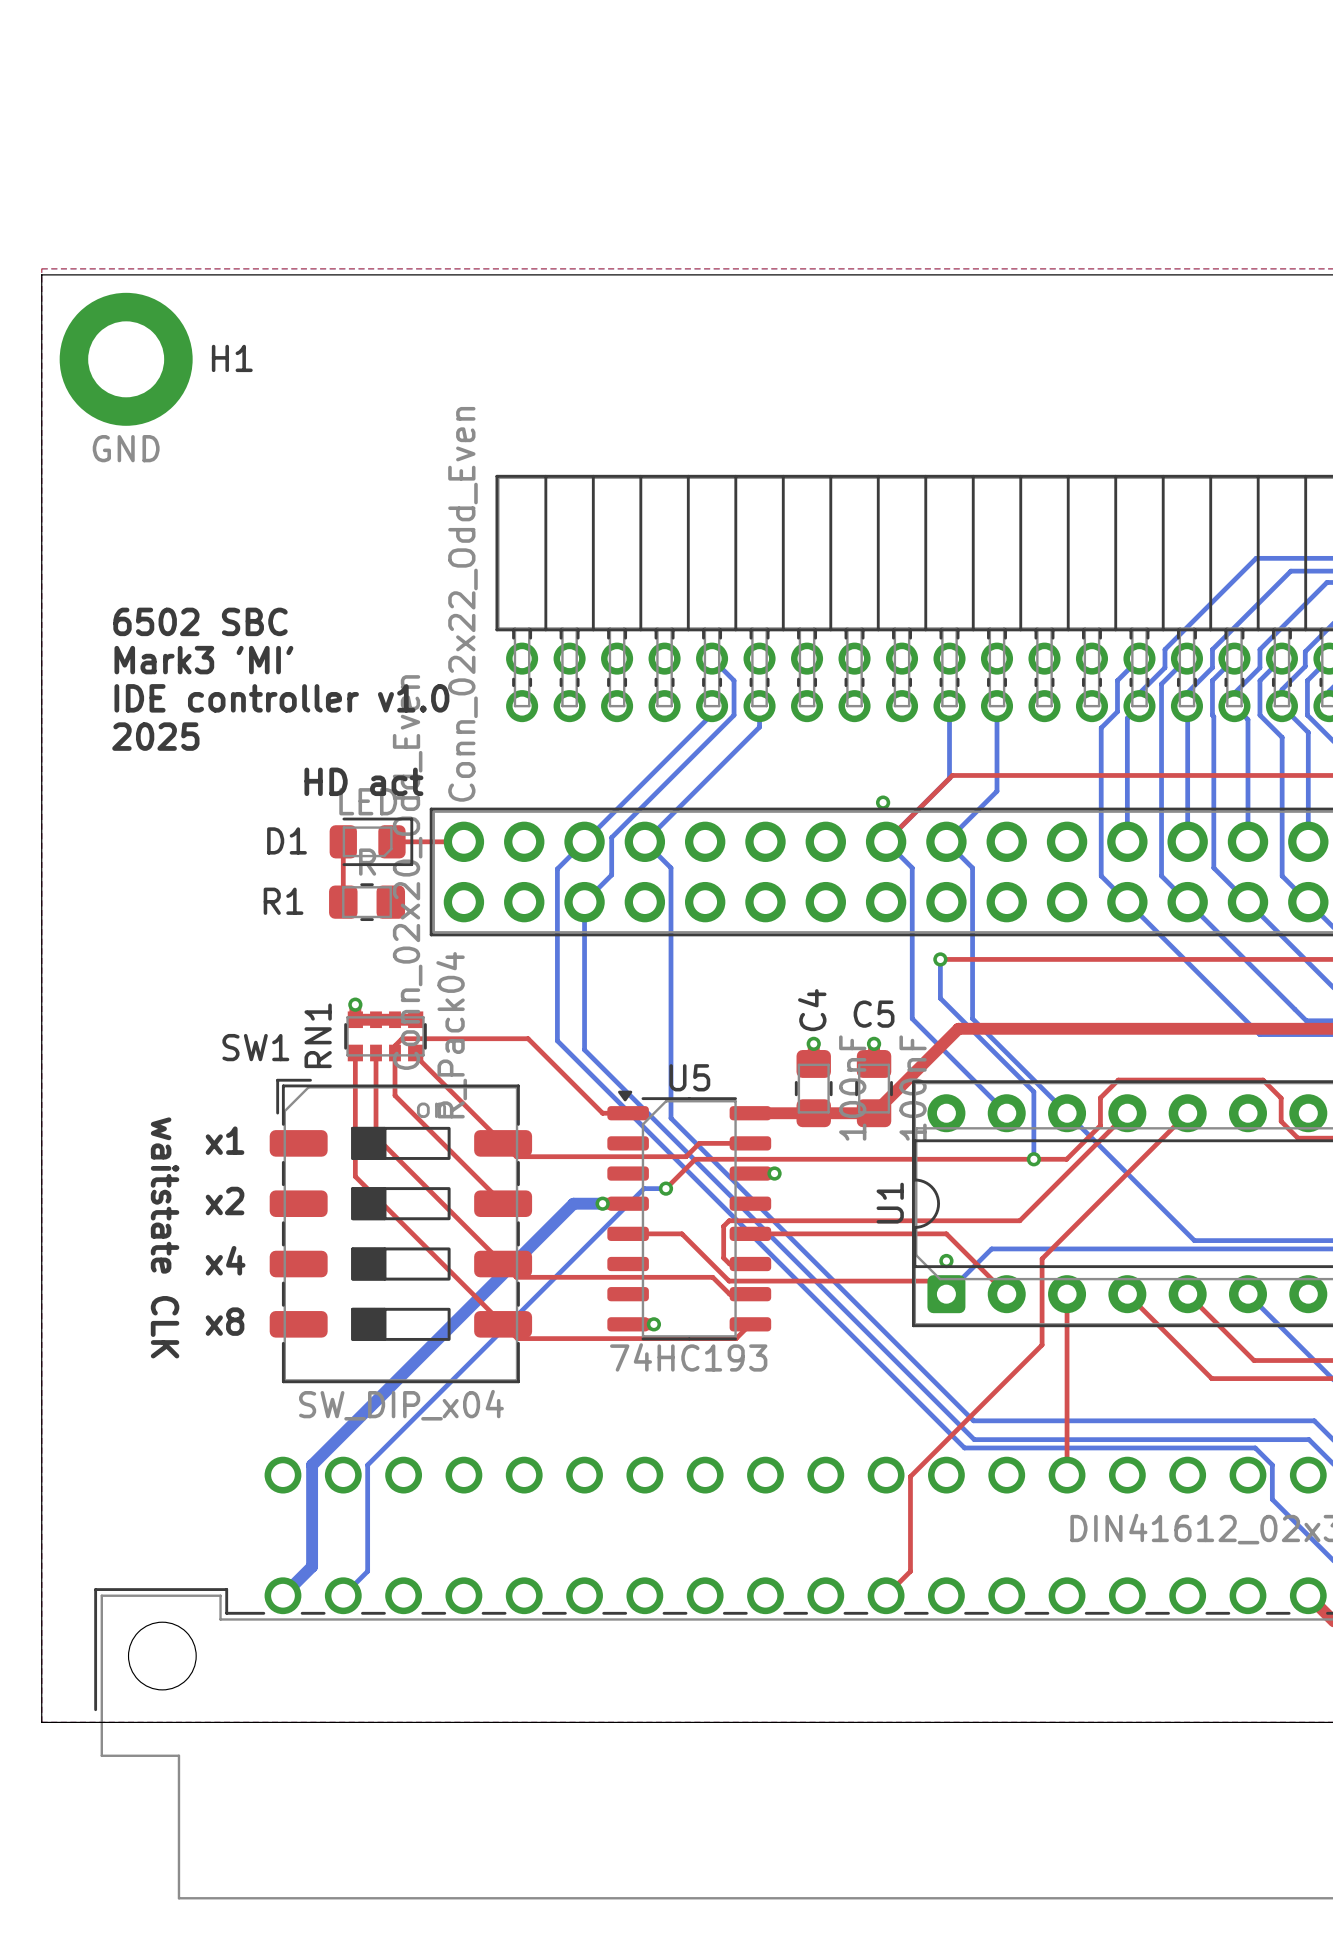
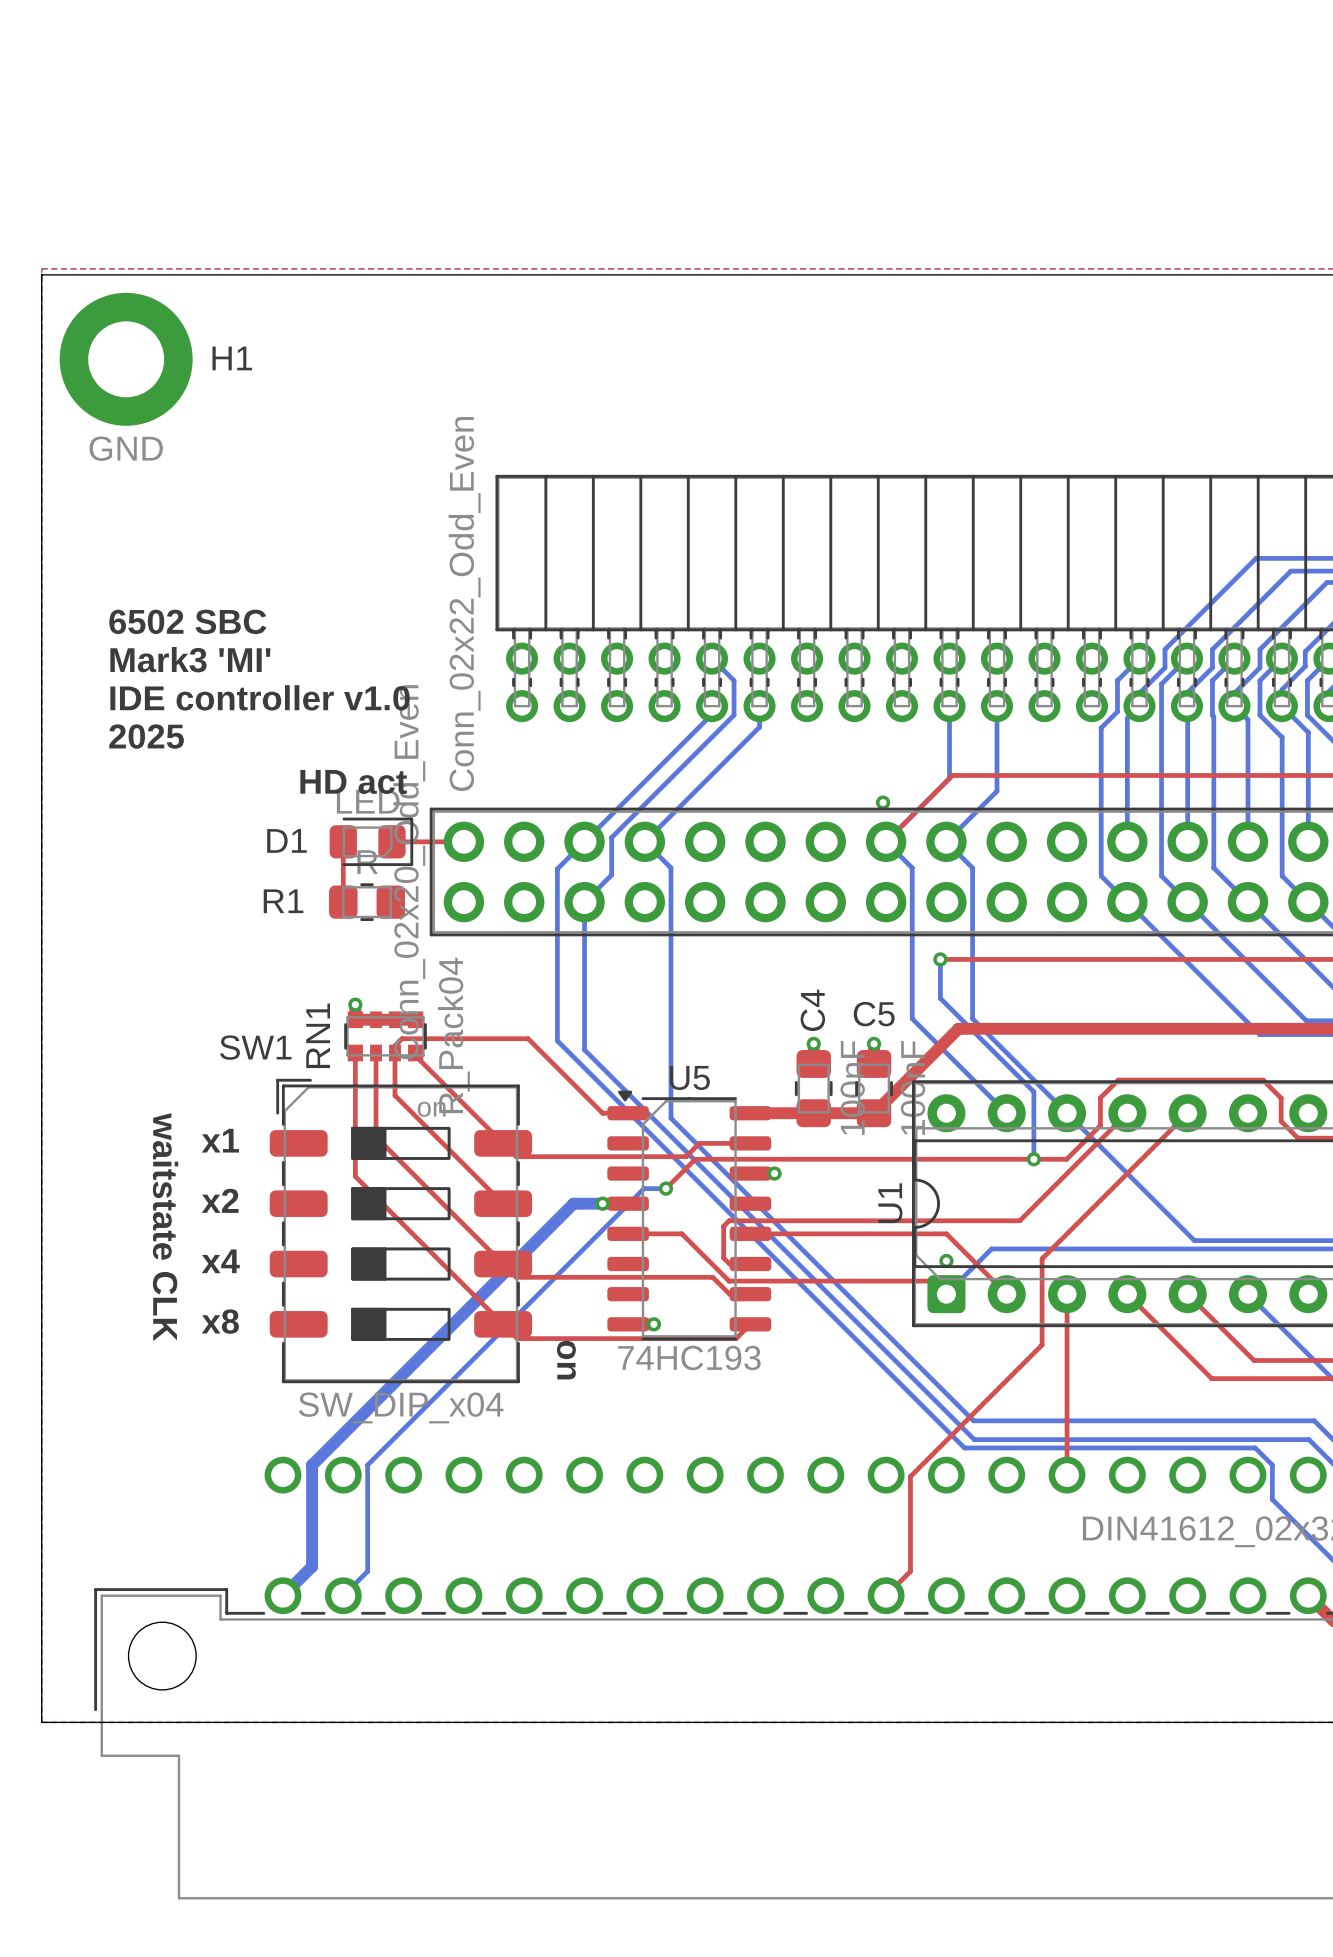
text: none -> on (566, 1360)

